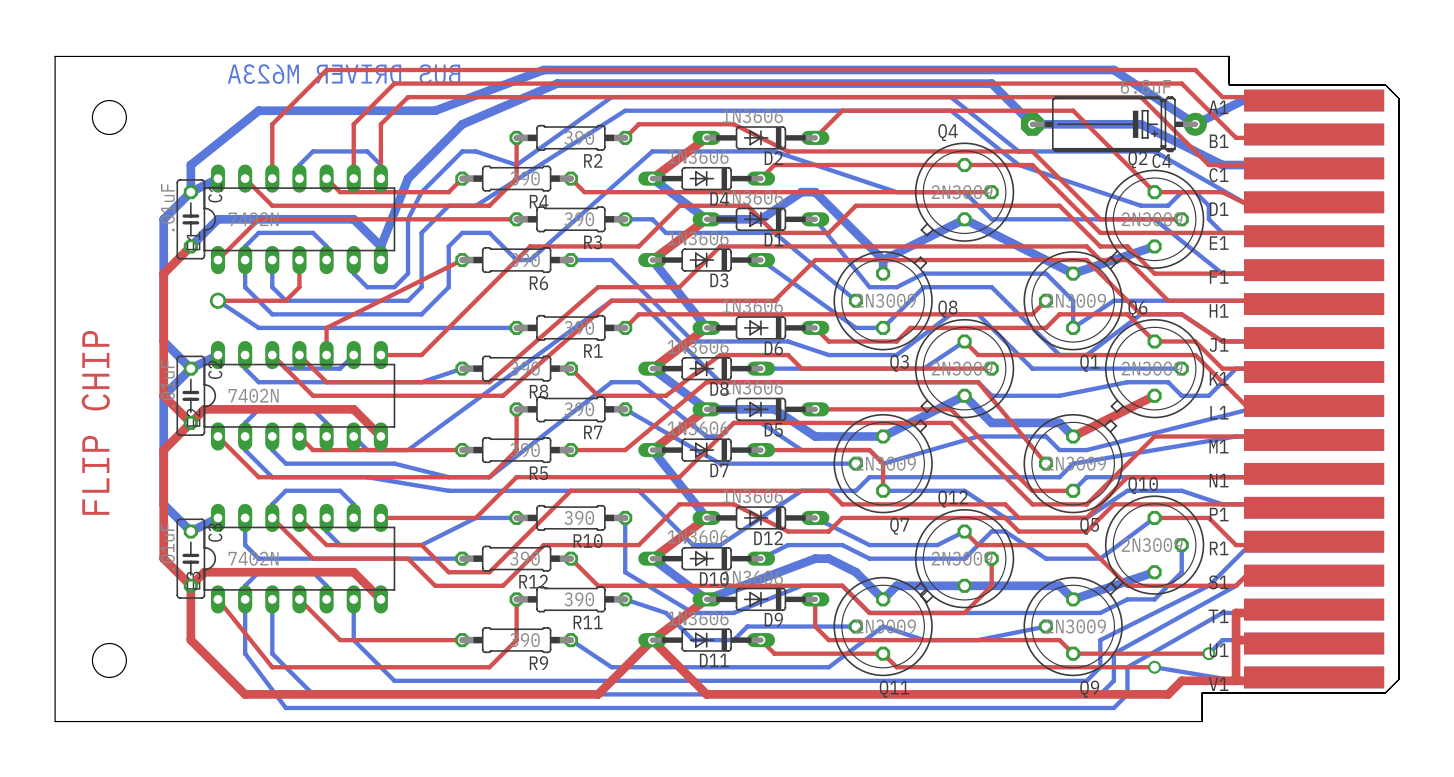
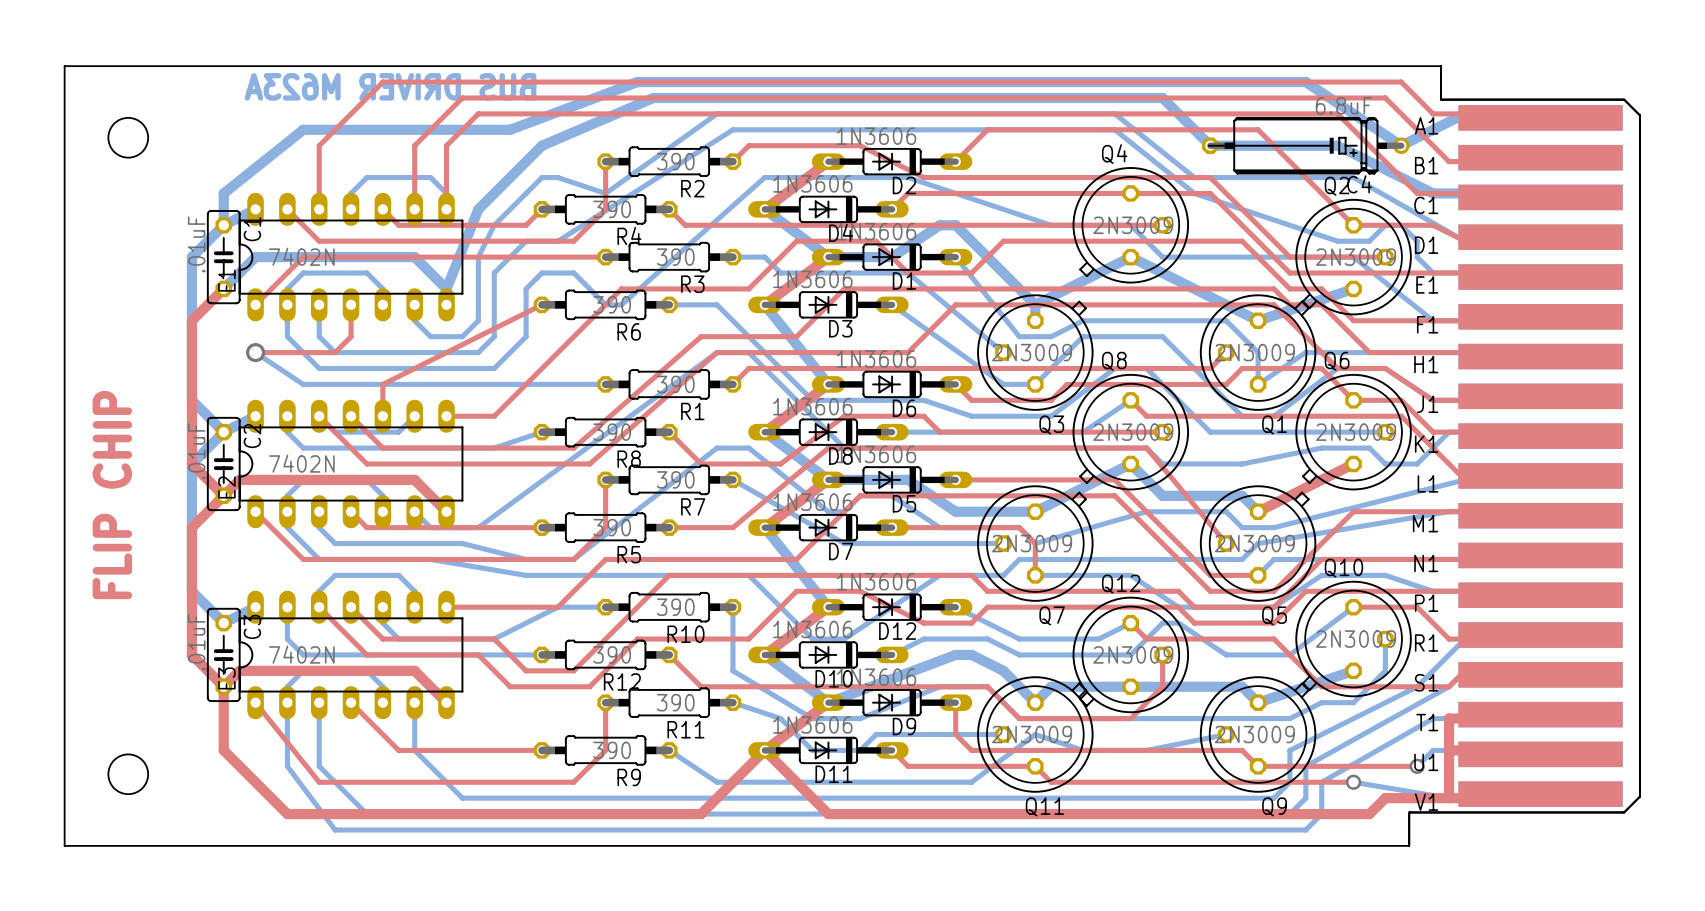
C4 footprint: [1020, 96, 1207, 153] -> [1202, 116, 1410, 175]

